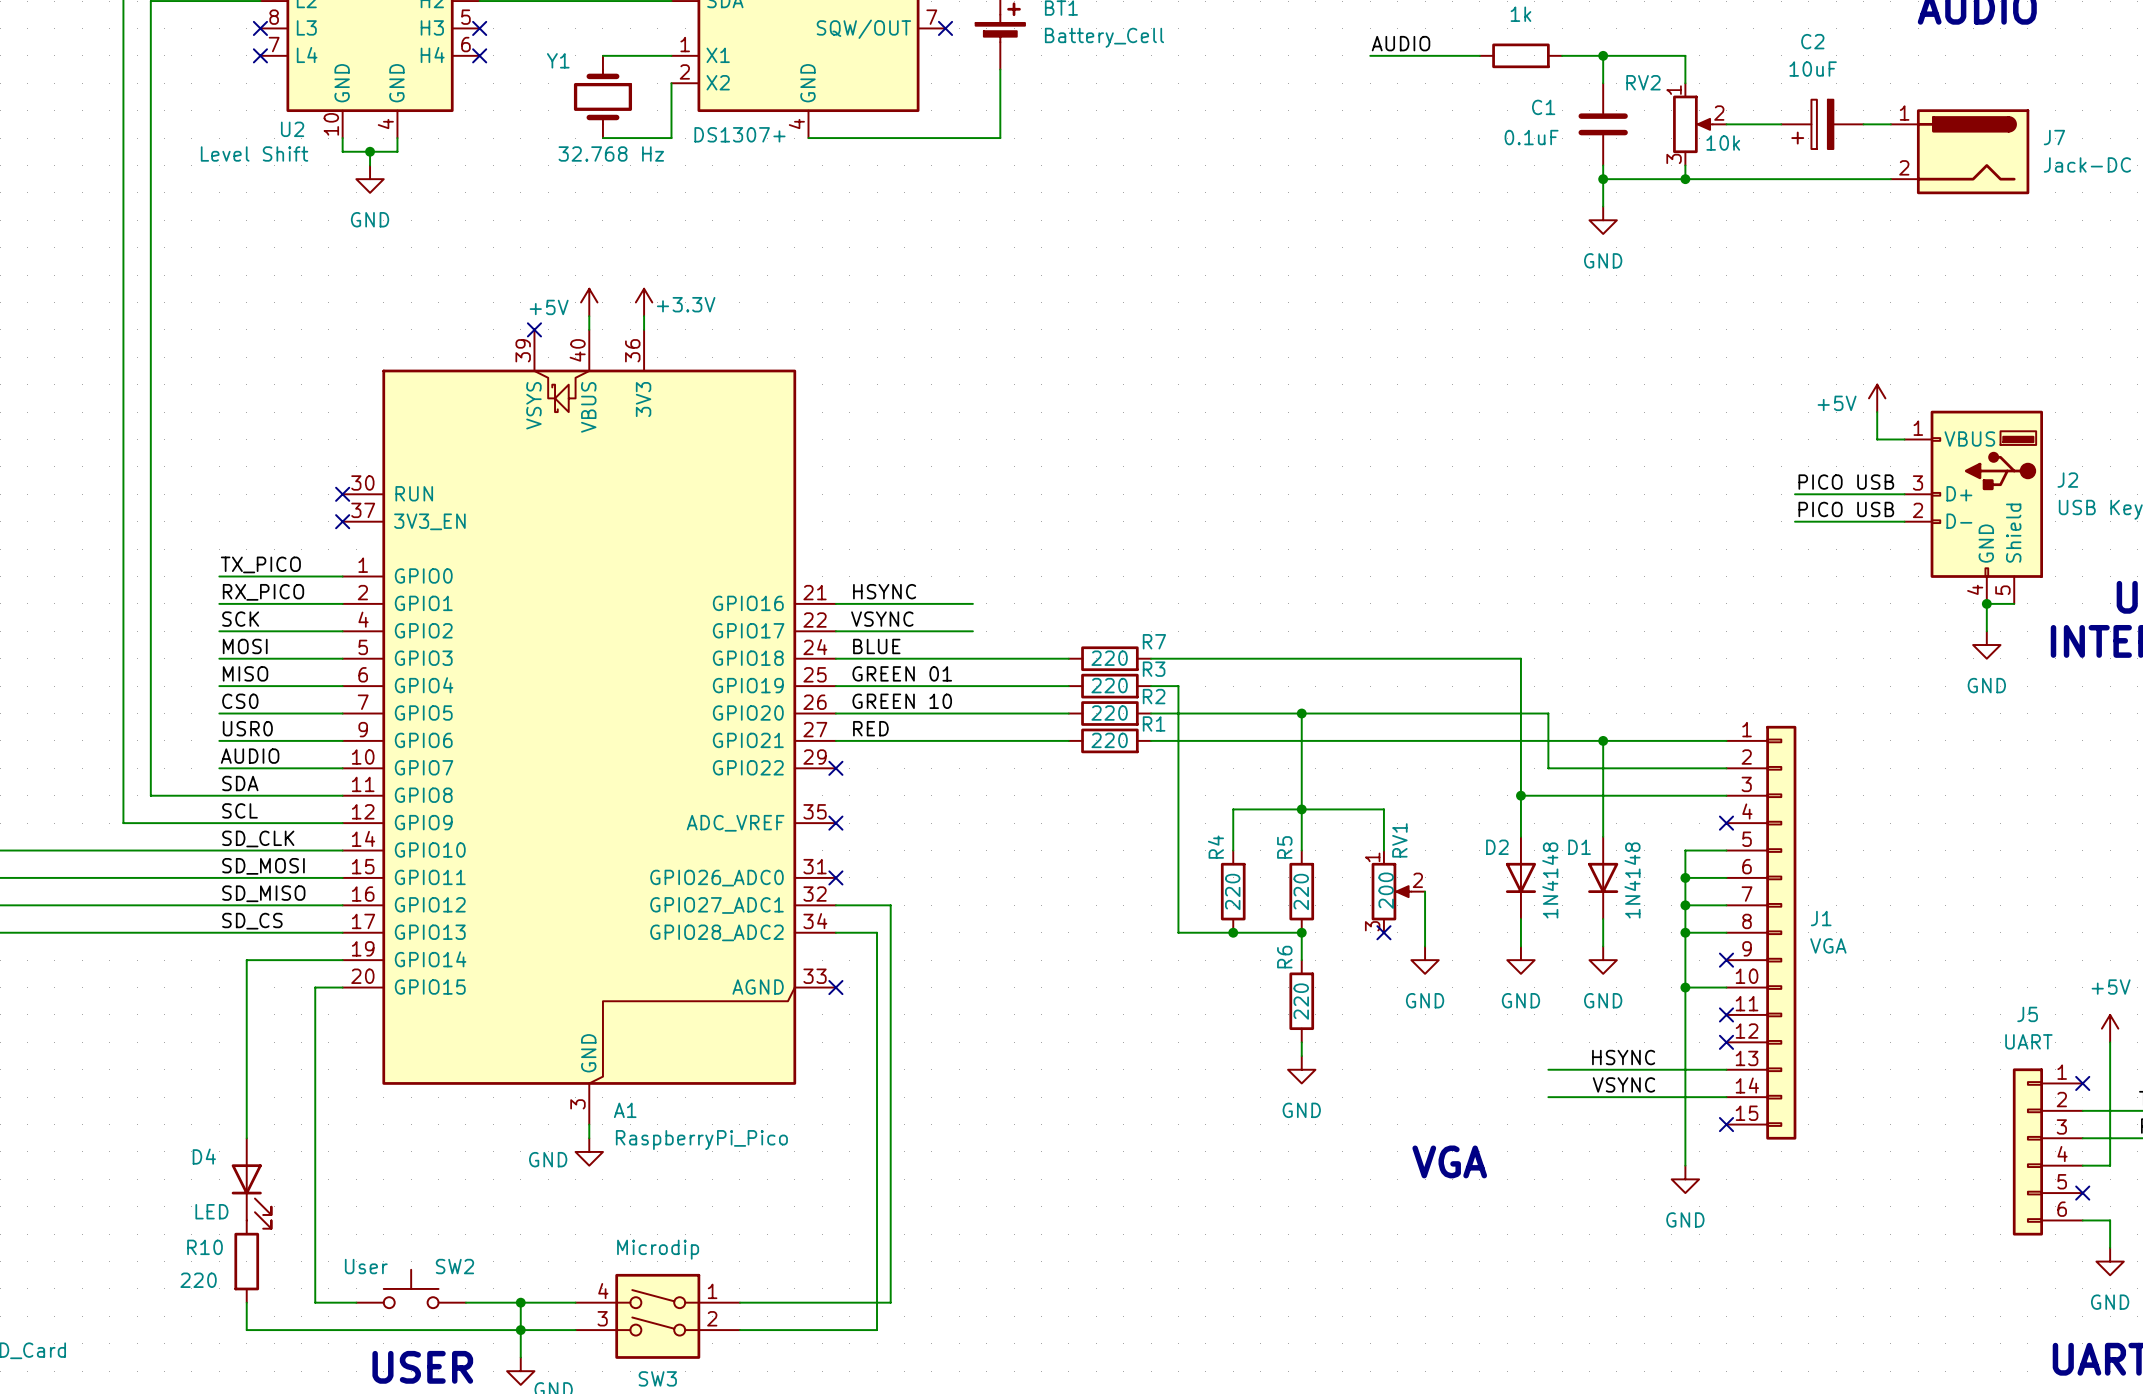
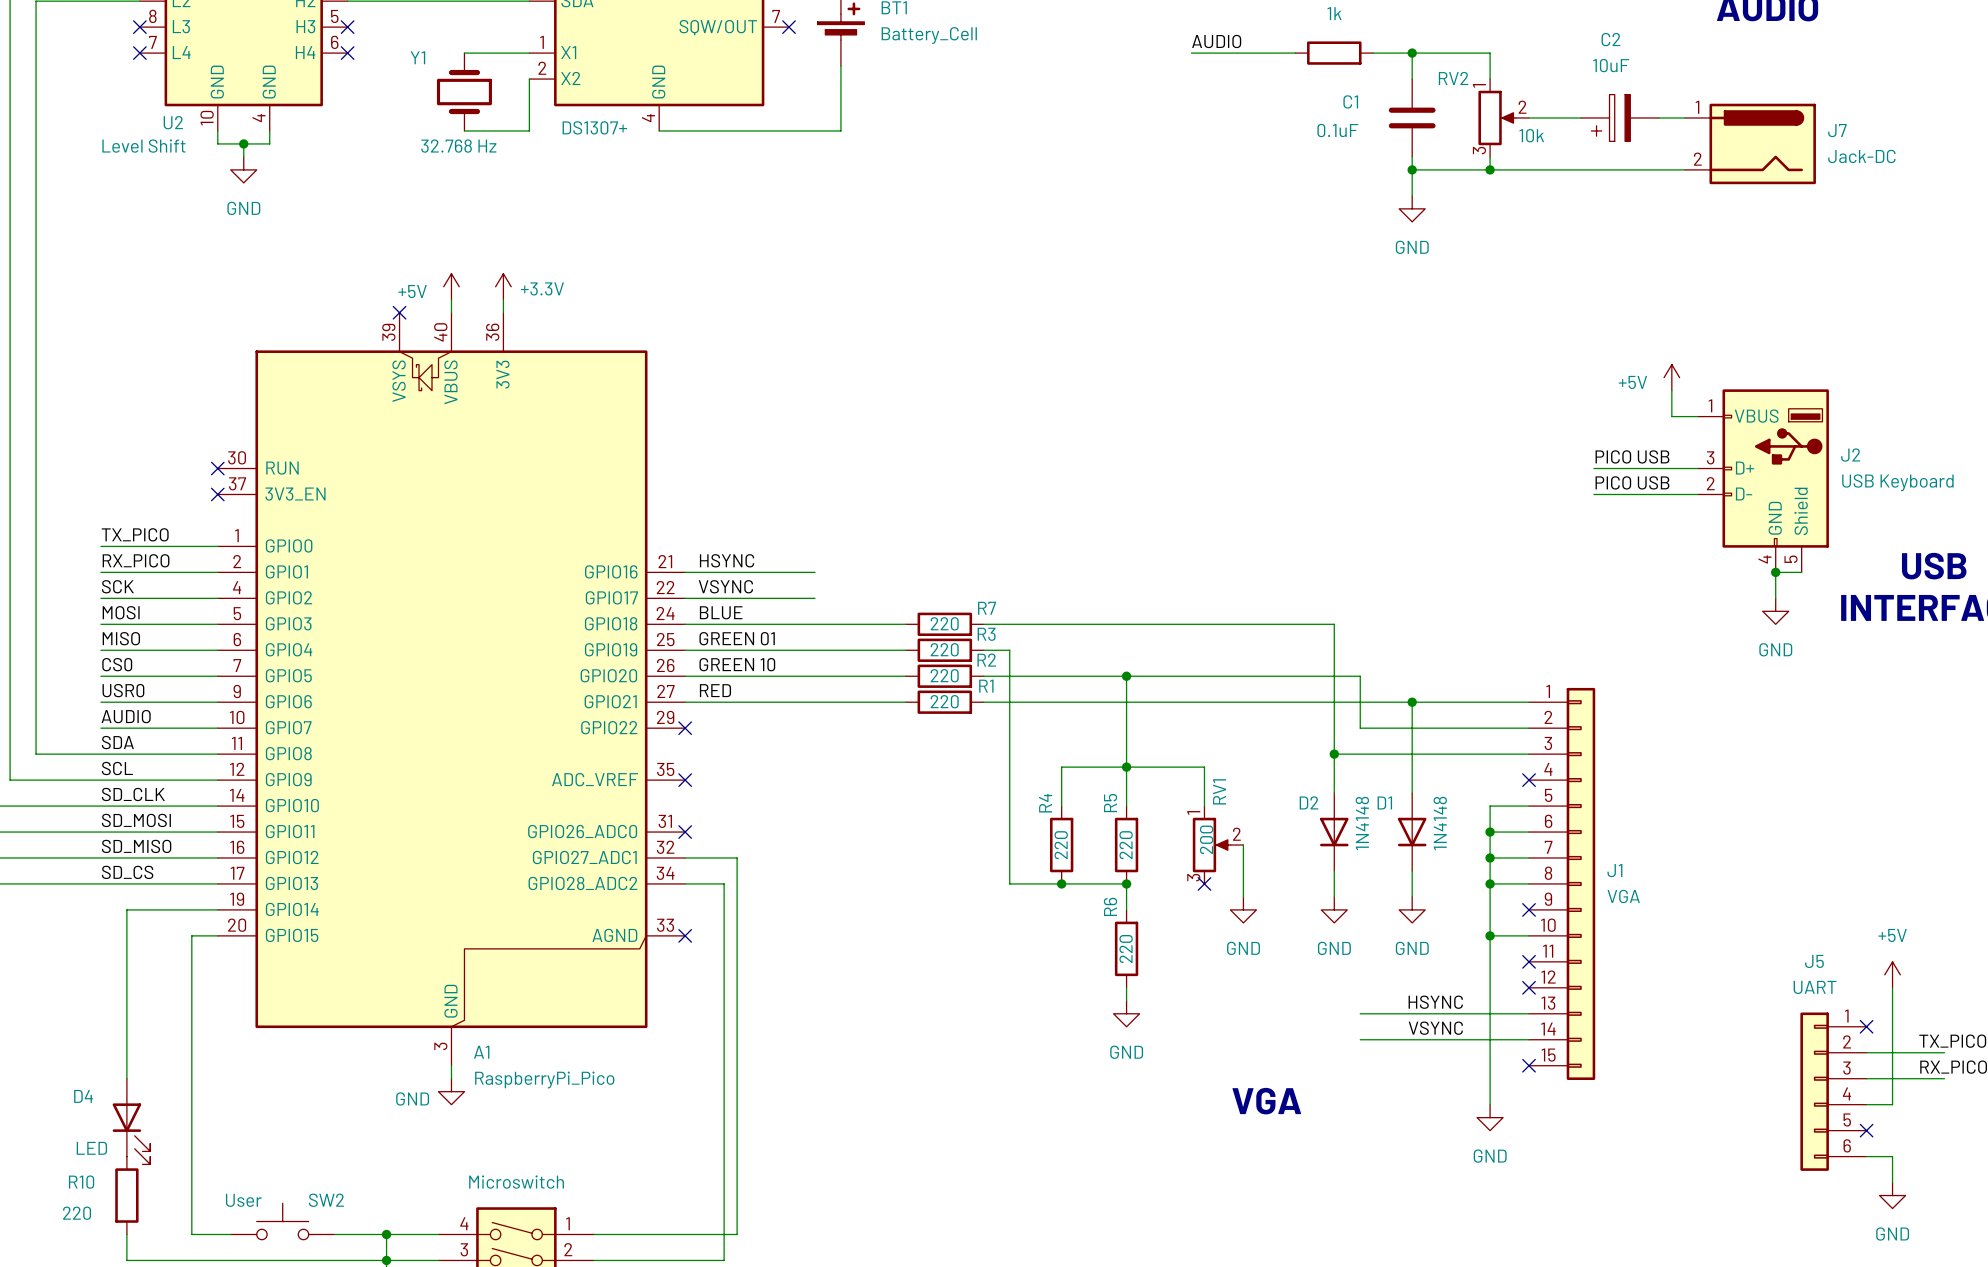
SW3 value: Microdip (658, 1249) -> Microswitch (516, 1182)

